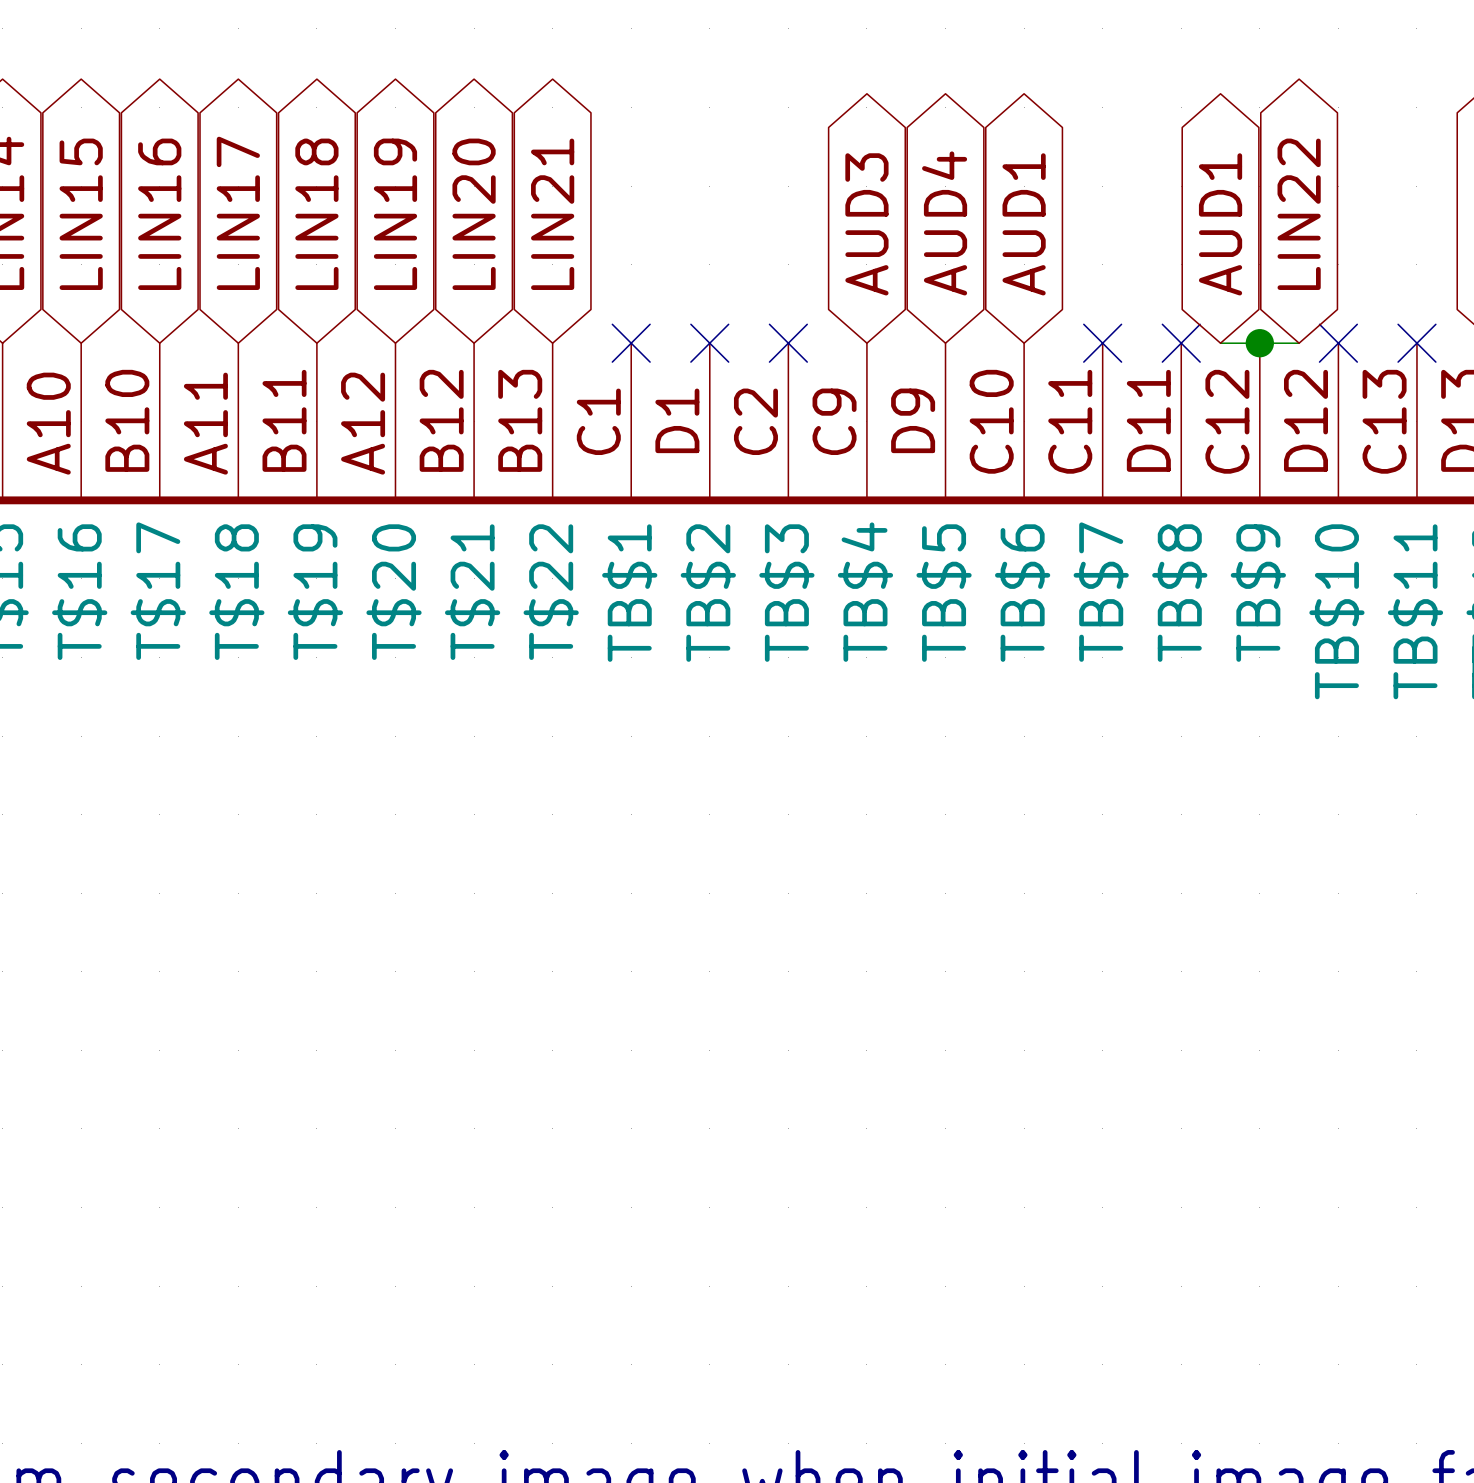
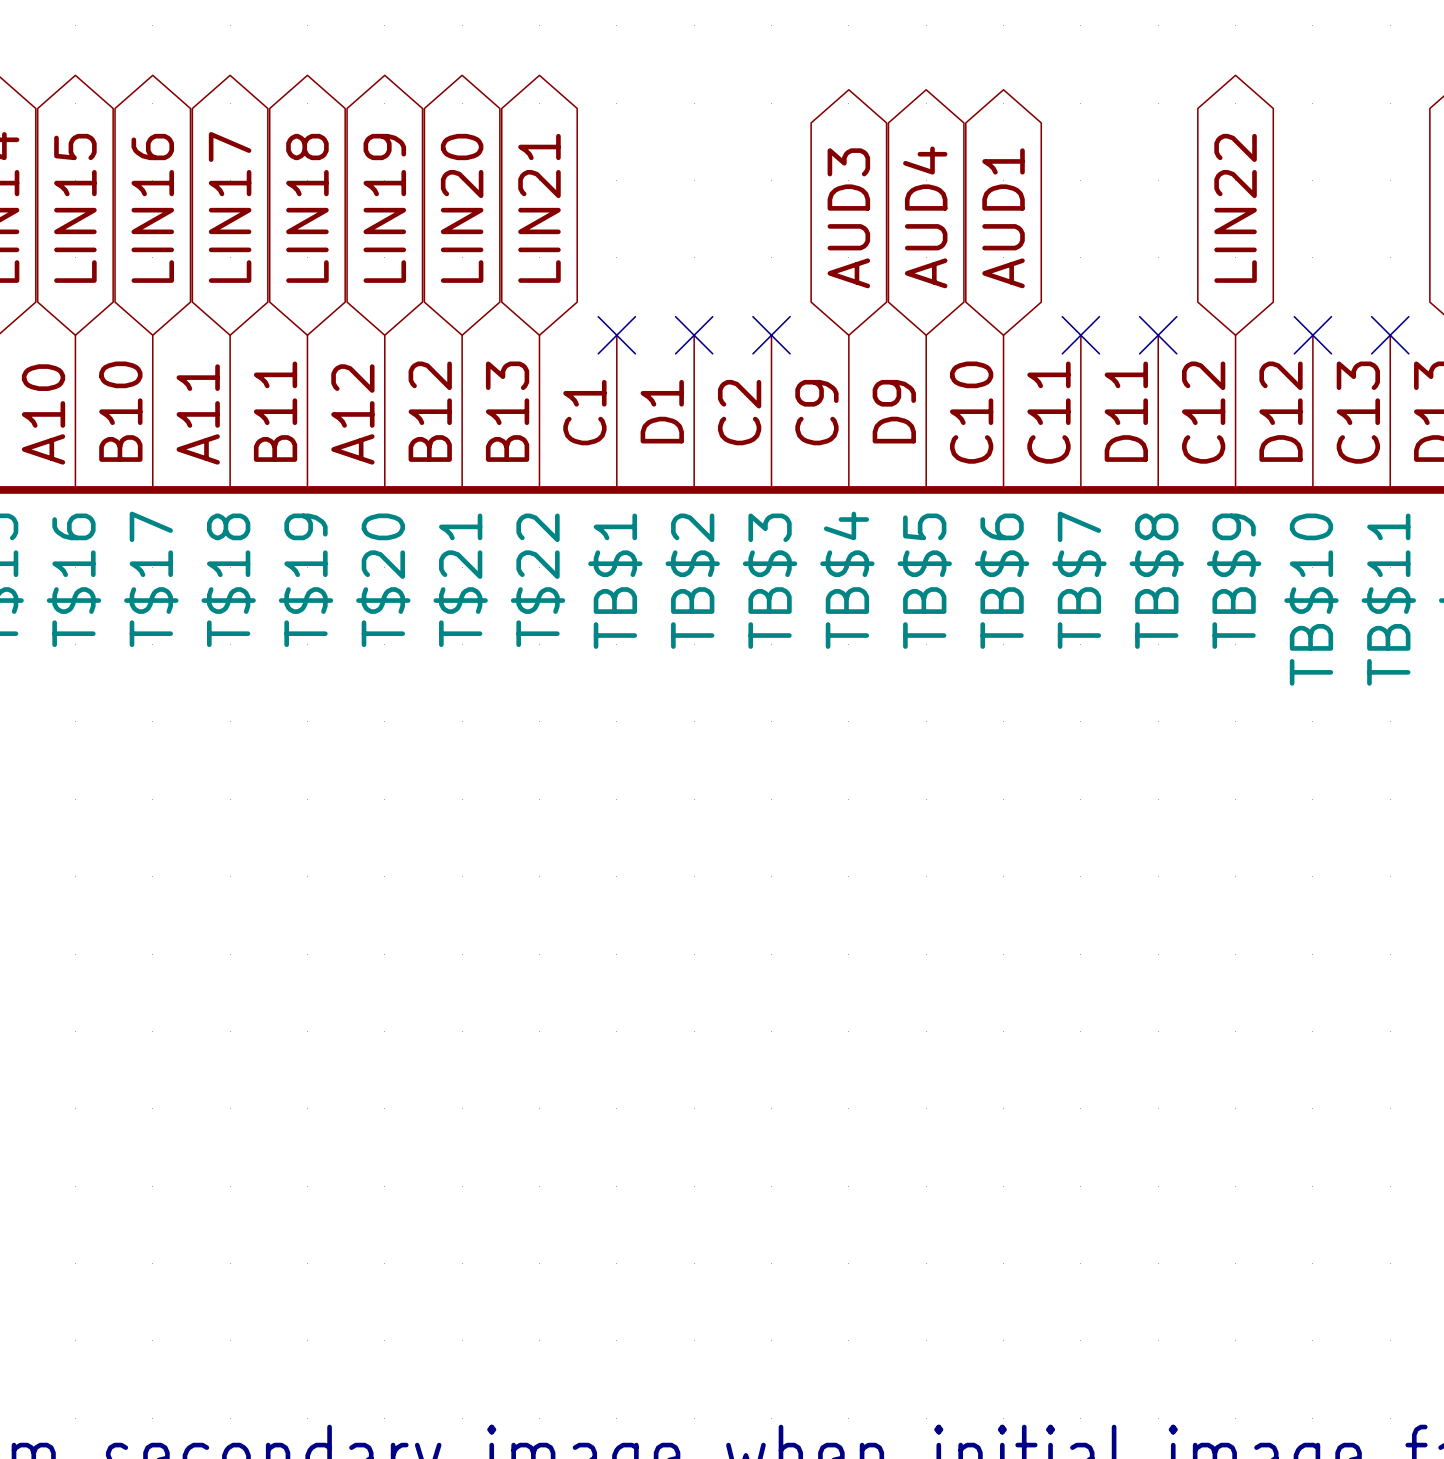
global label position: LIN22 (1299, 214) -> LIN22 (1235, 208)
global label: AUD1 (1220, 224) -> none
wire: (1220, 343) (1299, 343) -> none
junction: (1259, 343) -> none

